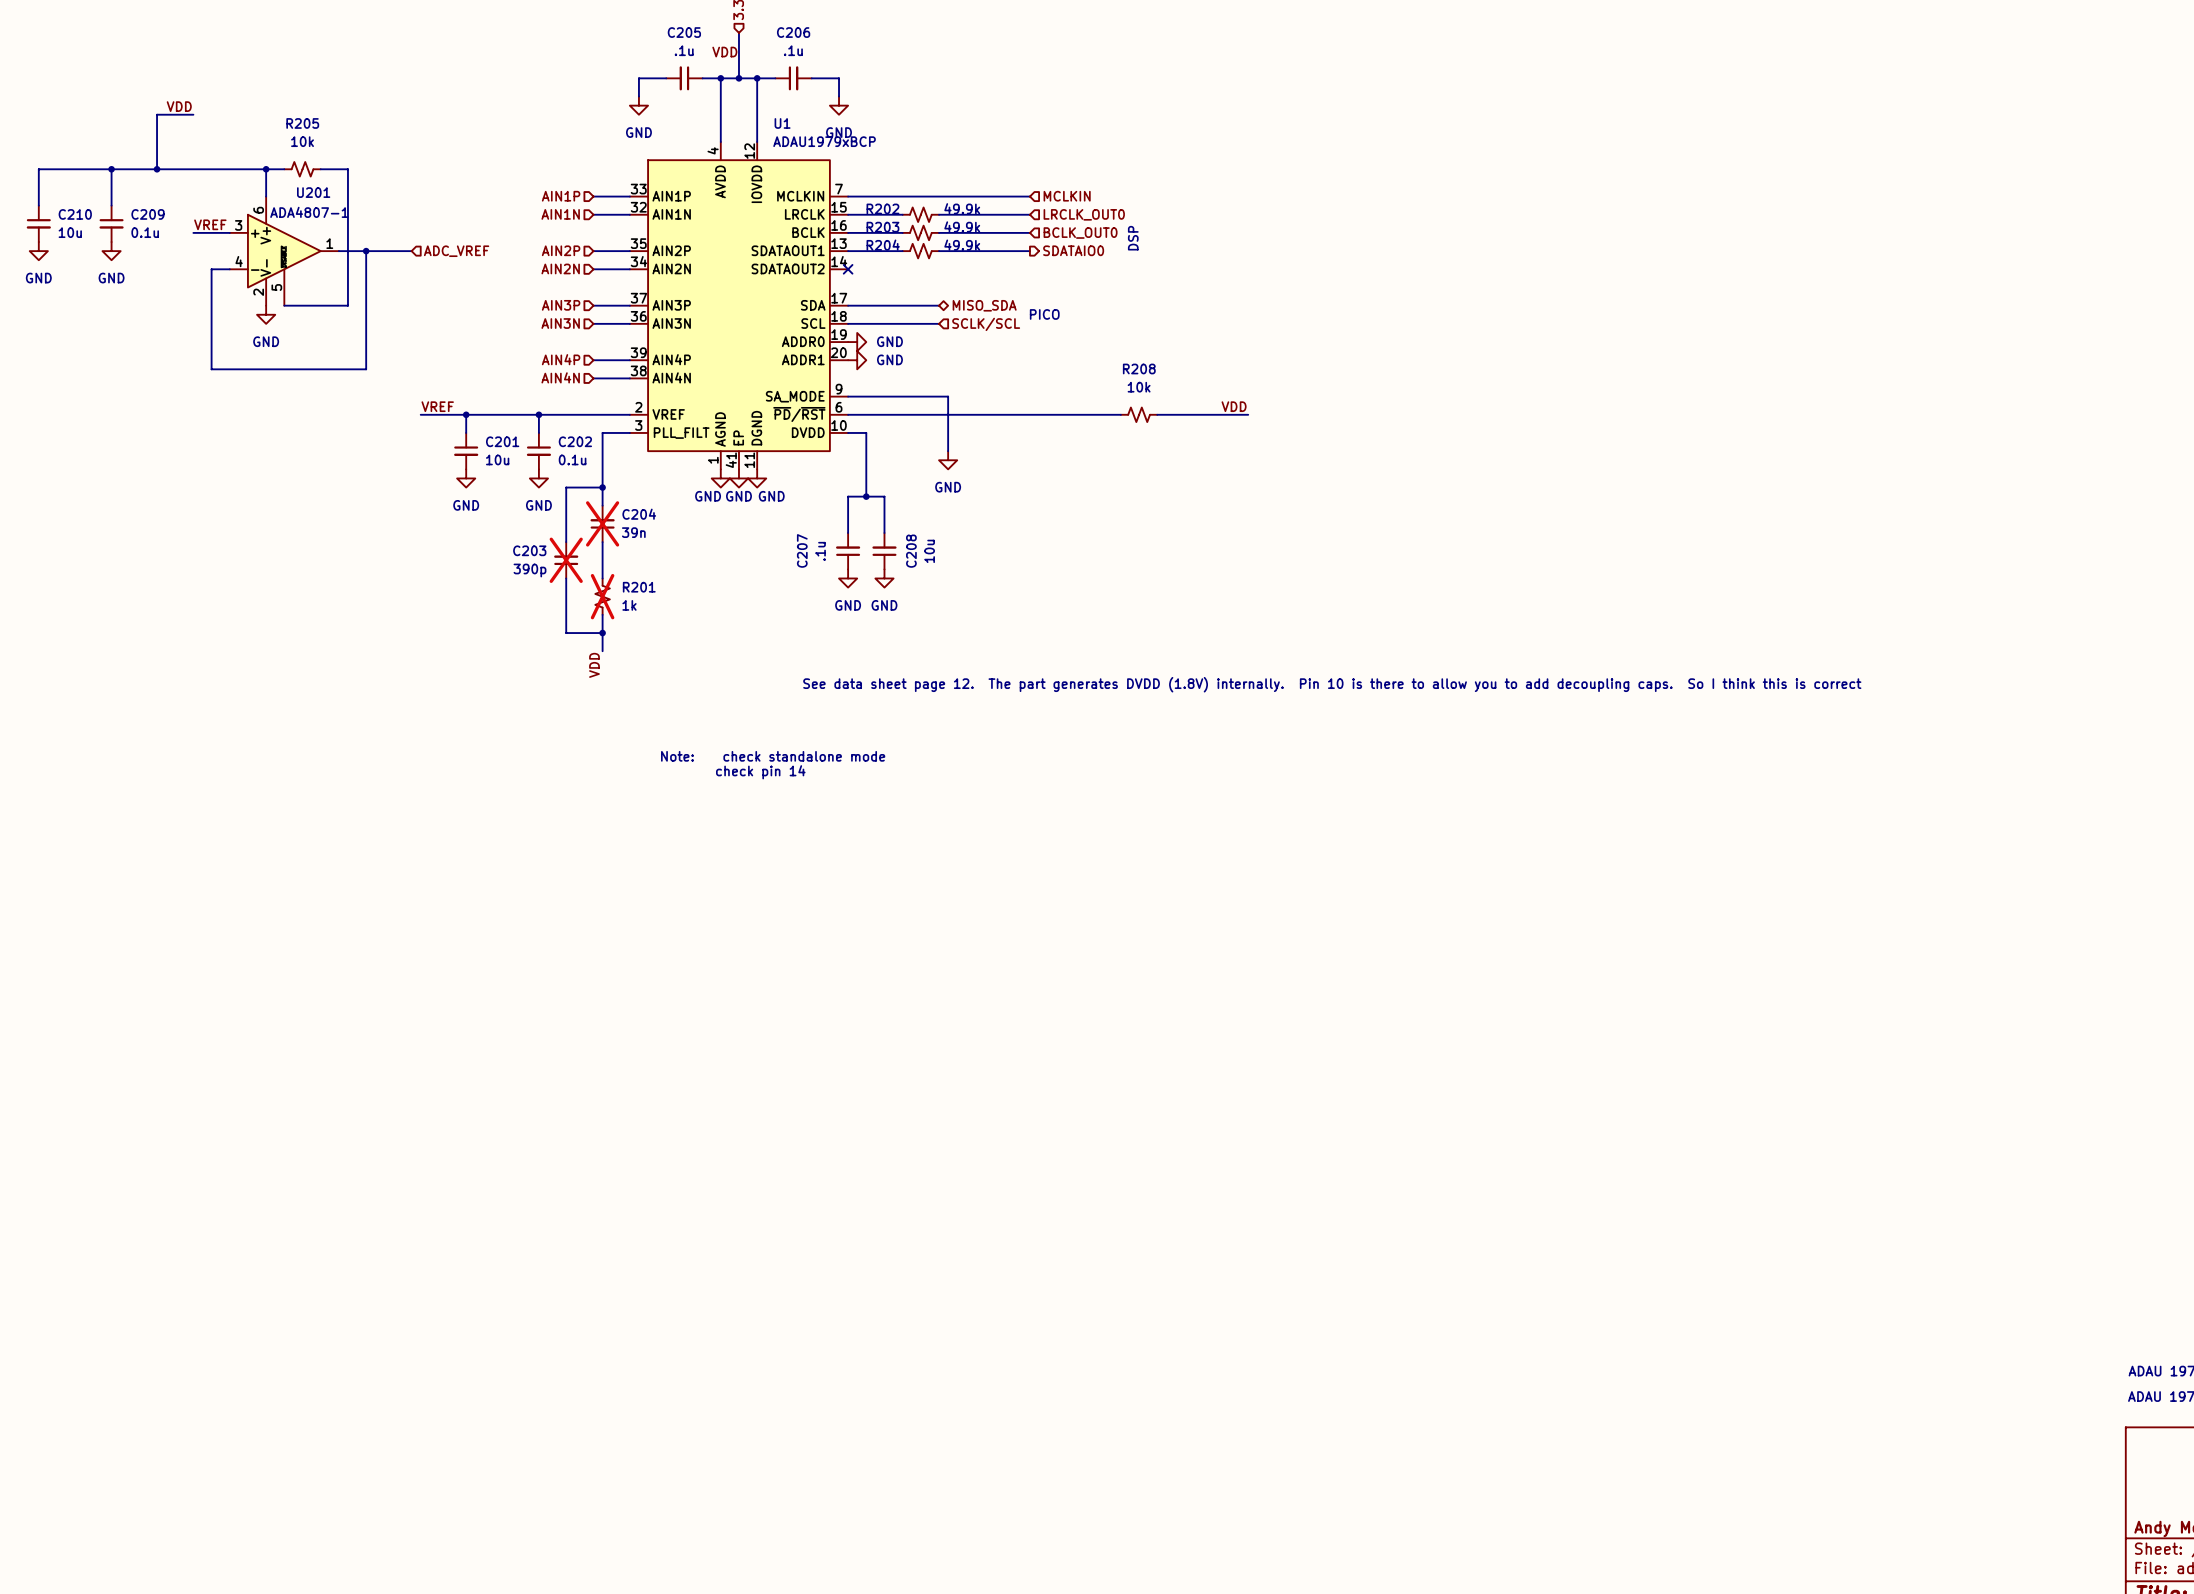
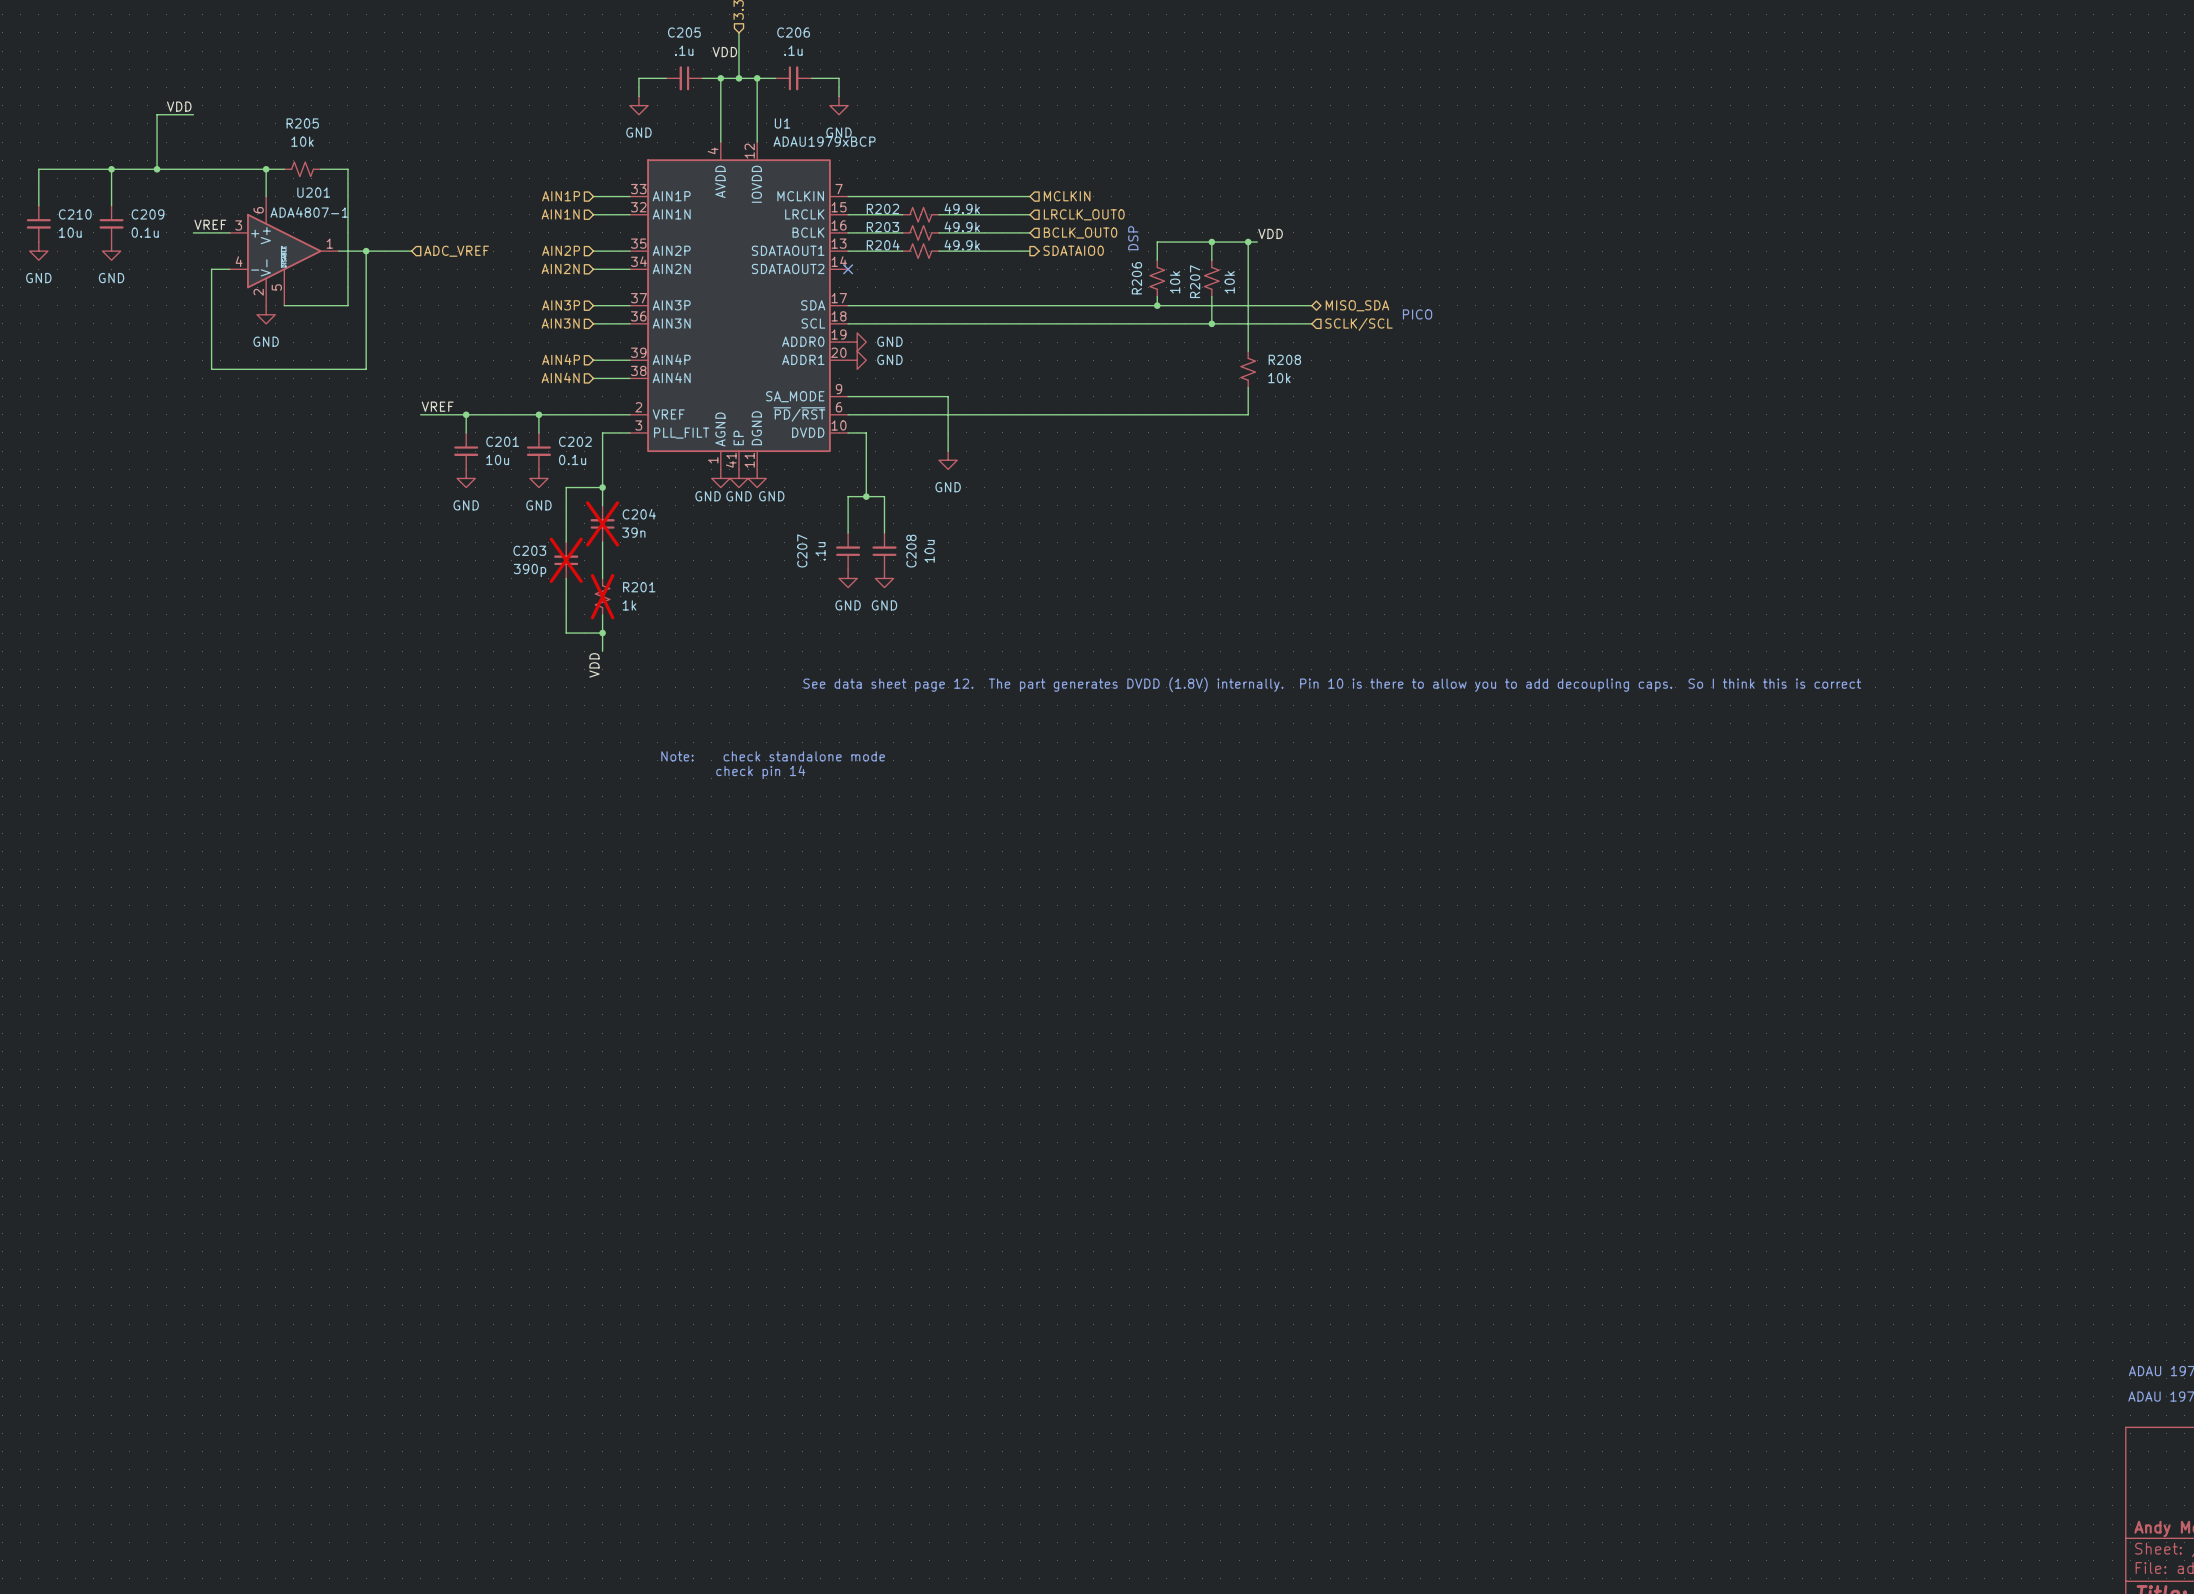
wire: none -> (1211, 242) (1211, 260)
junction: none -> (1211, 242)
wire: none -> (1248, 242) (1248, 351)
junction: none -> (1248, 242)
wire: none -> (1257, 242) (1157, 242) (1157, 260)
R206: none -> 10k (1157, 278)
R207: none -> 10k (1211, 278)
wire: none -> (1157, 296) (1157, 305)
wire: none -> (1211, 296) (1211, 323)
wire: none -> (939, 305) (1311, 305)
hierarchical label: MISO_SDA (984, 305) -> none
junction: none -> (1157, 305)
hierarchical label: none -> MISO_SDA (1357, 305)
text: PICO (1044, 314) -> none
text: none -> PICO (1417, 314)
wire: none -> (939, 323) (1311, 323)
junction: none -> (1211, 323)
hierarchical label: SCLK/SCL (986, 324) -> none
hierarchical label: none -> SCLK/SCL (1358, 324)
wire: none -> (1248, 387) (1248, 414)
label position: VDD (1234, 406) -> VDD (1270, 233)
R208 rotation: 0° (1139, 414) -> 90° clockwise (1248, 369)
R208 position: (1139, 414) -> (1248, 369)

